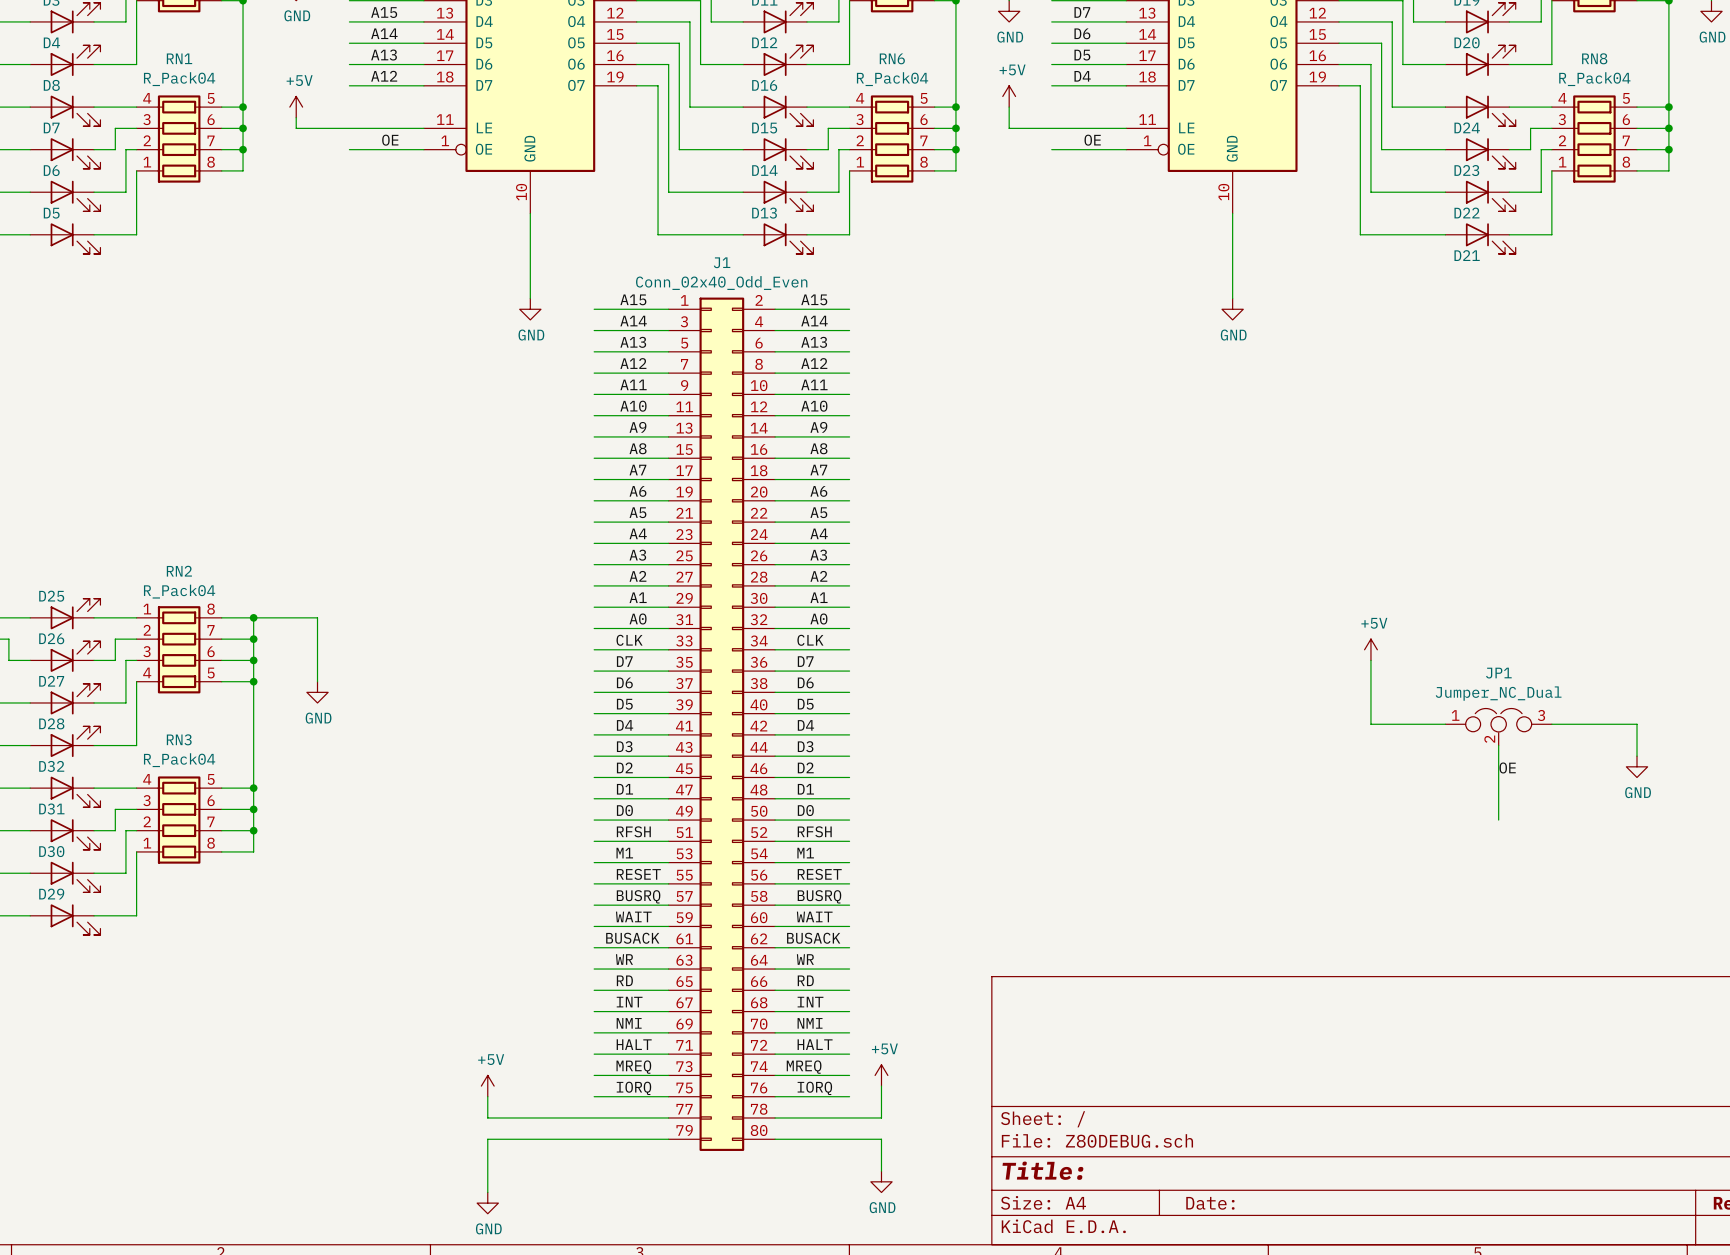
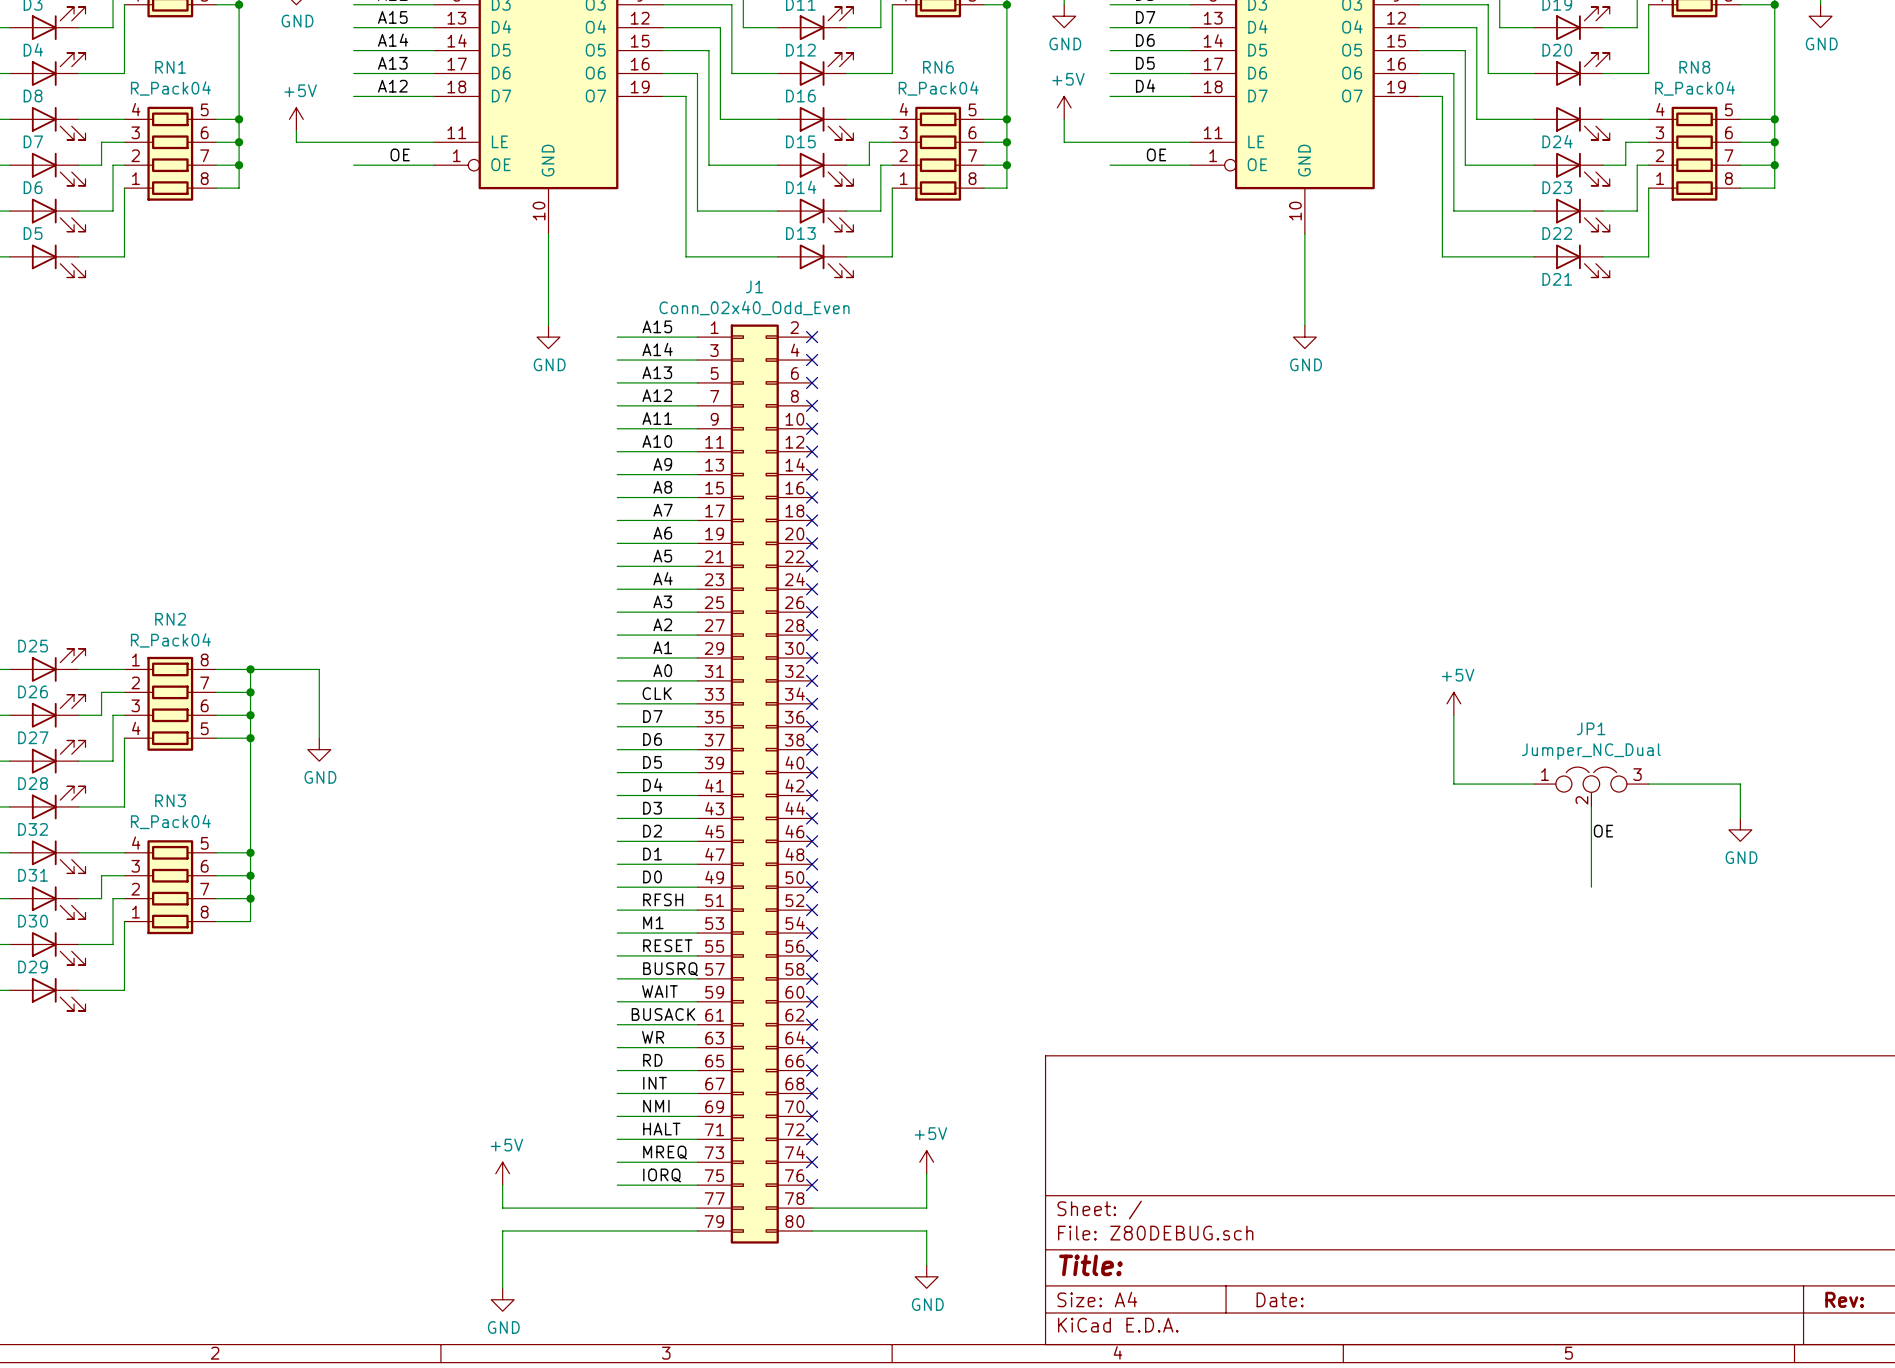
label: A15 (814, 299) -> none
wire: (775, 309) (849, 309) -> none
no-connect mark: none -> (812, 337)
label: A14 (814, 321) -> none
wire: (775, 330) (849, 330) -> none
no-connect mark: none -> (812, 360)
label: A13 (814, 342) -> none
wire: (775, 351) (849, 351) -> none
no-connect mark: none -> (812, 382)
label: A12 (814, 363) -> none
wire: (775, 373) (849, 373) -> none
no-connect mark: none -> (812, 405)
label: A11 (814, 384) -> none
wire: (775, 394) (849, 394) -> none
no-connect mark: none -> (812, 428)
label: A10 (814, 406) -> none
wire: (775, 415) (849, 415) -> none
no-connect mark: none -> (812, 451)
label: A9 (818, 427) -> none
wire: (775, 436) (849, 436) -> none
no-connect mark: none -> (812, 474)
label: A8 (818, 448) -> none
wire: (775, 458) (849, 458) -> none
no-connect mark: none -> (812, 497)
label: A7 (818, 470) -> none
wire: (775, 479) (849, 479) -> none
no-connect mark: none -> (812, 520)
label: A6 (818, 491) -> none
wire: (775, 500) (849, 500) -> none
no-connect mark: none -> (812, 543)
label: A5 (818, 512) -> none
wire: (775, 522) (849, 522) -> none
no-connect mark: none -> (812, 566)
label: A4 (819, 533) -> none
wire: (775, 543) (849, 543) -> none
no-connect mark: none -> (812, 589)
label: A3 (818, 555) -> none
wire: (775, 564) (849, 564) -> none
no-connect mark: none -> (812, 612)
label: A2 (818, 576) -> none
wire: (775, 585) (849, 585) -> none
no-connect mark: none -> (812, 635)
label: A1 (819, 597) -> none
wire: (775, 607) (849, 607) -> none
no-connect mark: none -> (812, 657)
label: A0 (818, 619) -> none
wire: (775, 628) (849, 628) -> none
no-connect mark: none -> (812, 680)
label: CLK (810, 640) -> none
wire: (775, 649) (849, 649) -> none
no-connect mark: none -> (812, 703)
label: D7 (805, 661) -> none
wire: (775, 671) (849, 671) -> none
no-connect mark: none -> (812, 726)
label: D6 (805, 682) -> none
wire: (775, 692) (849, 692) -> none
no-connect mark: none -> (812, 749)
label: D5 (805, 704) -> none
wire: (775, 713) (849, 713) -> none
no-connect mark: none -> (812, 772)
label: D4 (805, 725) -> none
wire: (775, 734) (849, 734) -> none
no-connect mark: none -> (812, 795)
label: D3 (805, 746) -> none
wire: (775, 756) (849, 756) -> none
no-connect mark: none -> (812, 818)
label: D2 (805, 767) -> none
wire: (775, 777) (849, 777) -> none
no-connect mark: none -> (812, 841)
label: D1 (805, 789) -> none
wire: (775, 798) (849, 798) -> none
no-connect mark: none -> (812, 864)
label: D0 (805, 810) -> none
wire: (775, 820) (849, 820) -> none
no-connect mark: none -> (812, 887)
label: RFSH (814, 831) -> none
wire: (775, 841) (849, 841) -> none
no-connect mark: none -> (812, 910)
label: M1 (805, 853) -> none
wire: (775, 862) (849, 862) -> none
no-connect mark: none -> (812, 933)
label: RESET (819, 874) -> none
wire: (775, 883) (849, 883) -> none
no-connect mark: none -> (812, 955)
label: BUSRQ (819, 896) -> none
wire: (775, 905) (849, 905) -> none
no-connect mark: none -> (812, 978)
label: WAIT (814, 916) -> none
wire: (775, 926) (849, 926) -> none
no-connect mark: none -> (812, 1001)
label: BUSACK (813, 938) -> none
wire: (775, 947) (849, 947) -> none
no-connect mark: none -> (812, 1024)
label: WR (805, 959) -> none
wire: (775, 969) (849, 969) -> none
no-connect mark: none -> (812, 1047)
label: RD (805, 980) -> none
wire: (775, 990) (849, 990) -> none
no-connect mark: none -> (812, 1070)
label: INT (810, 1002) -> none
wire: (775, 1011) (849, 1011) -> none
no-connect mark: none -> (812, 1093)
label: NMI (810, 1023) -> none
wire: (775, 1032) (849, 1032) -> none
no-connect mark: none -> (812, 1116)
label: HALT (815, 1044) -> none
wire: (775, 1054) (849, 1054) -> none
no-connect mark: none -> (812, 1139)
label: MREQ (804, 1067) -> none
wire: (775, 1075) (849, 1075) -> none
no-connect mark: none -> (812, 1162)
label: IORQ (814, 1088) -> none
wire: (775, 1096) (849, 1096) -> none
no-connect mark: none -> (812, 1185)

